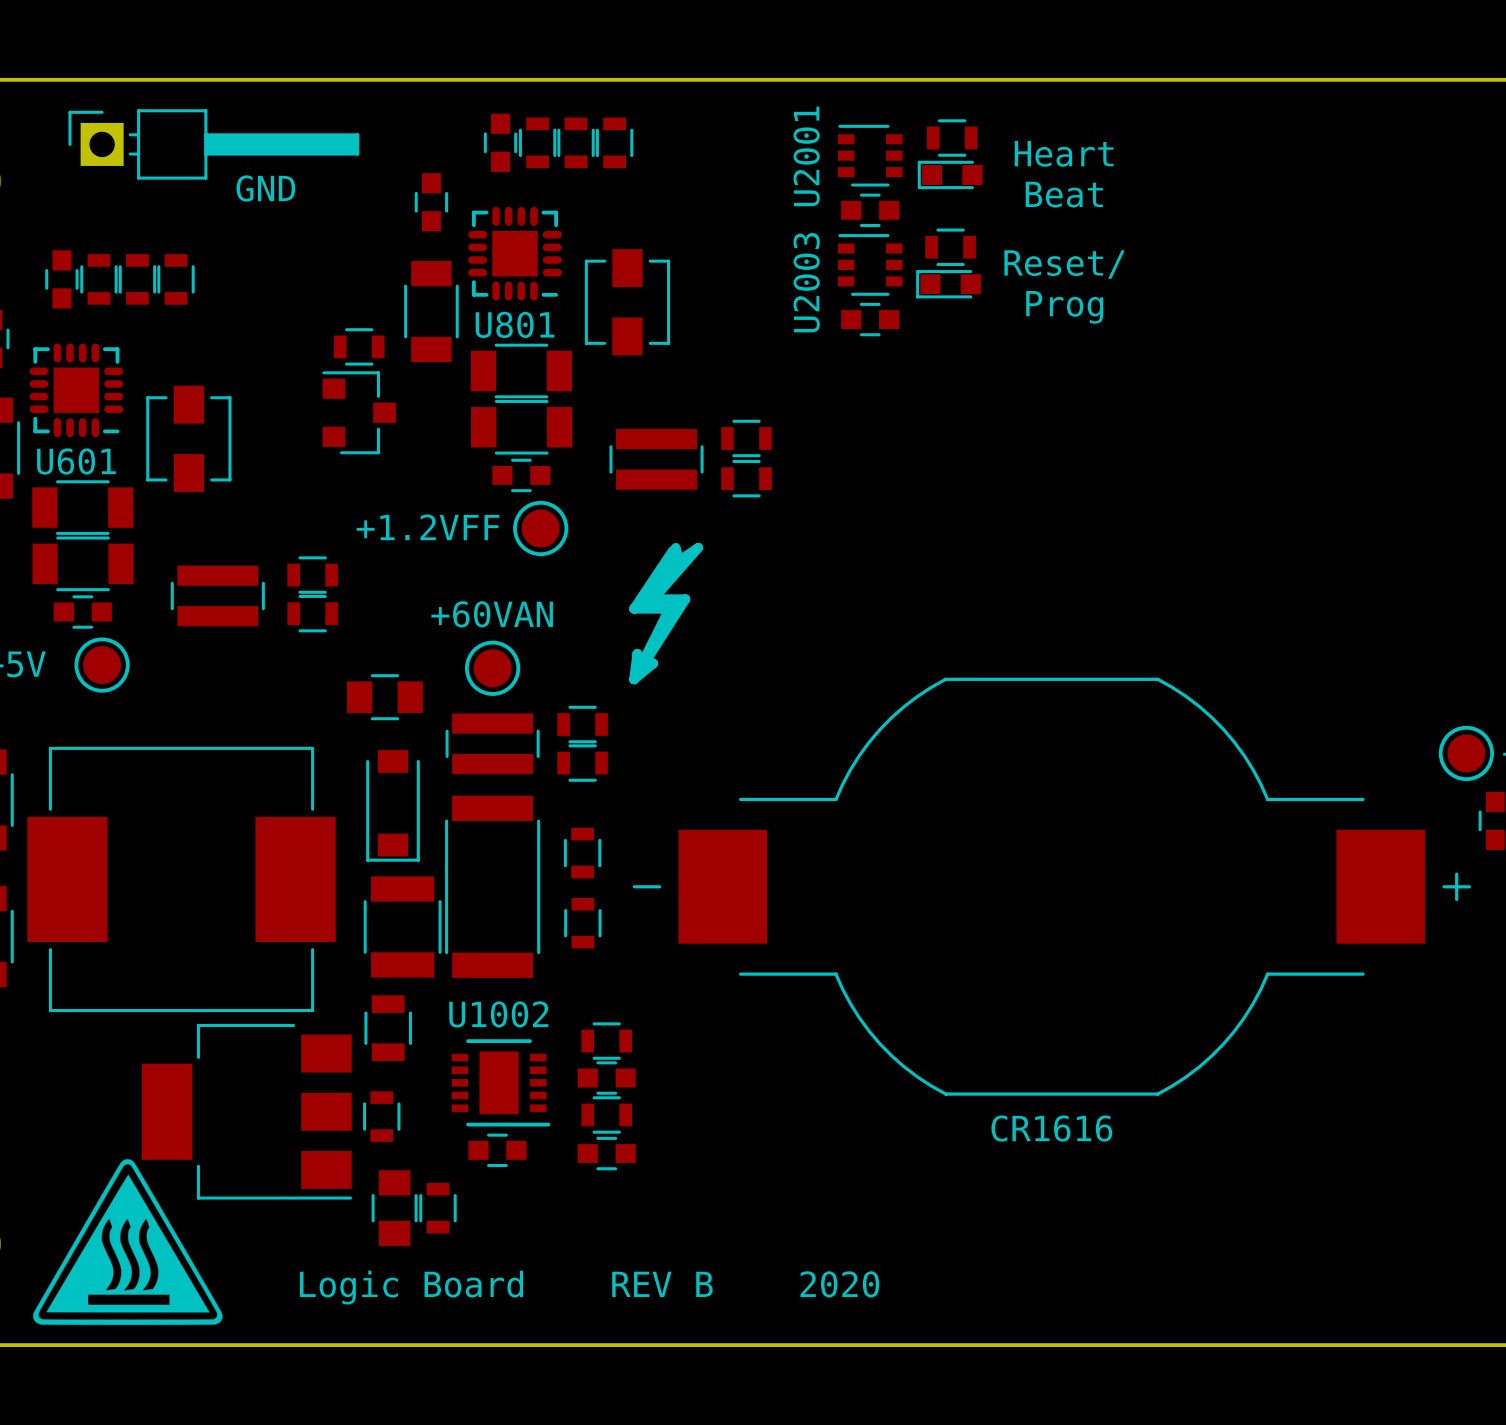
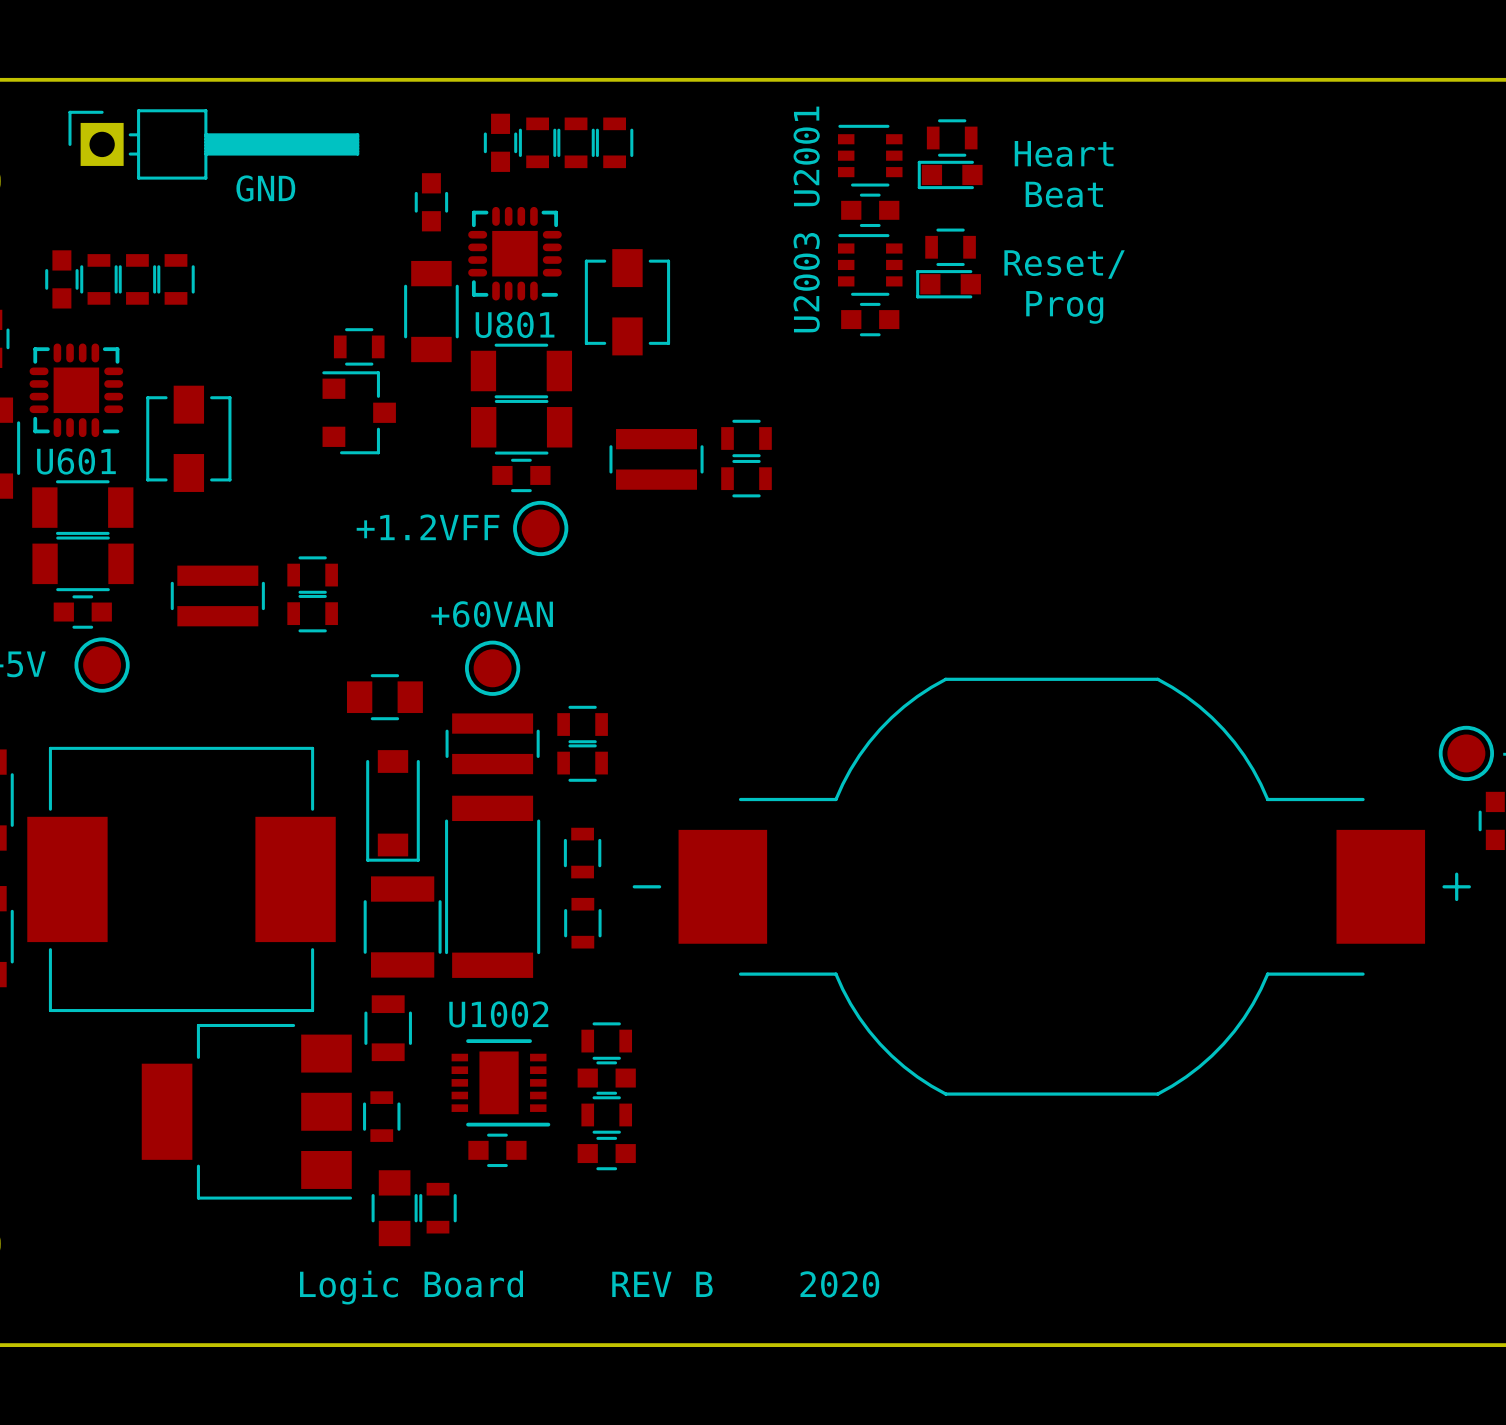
drawing: [629, 542, 704, 685] -> none
text: CR1616 (1051, 1128) -> none
drawing: [33, 1159, 223, 1325] -> none

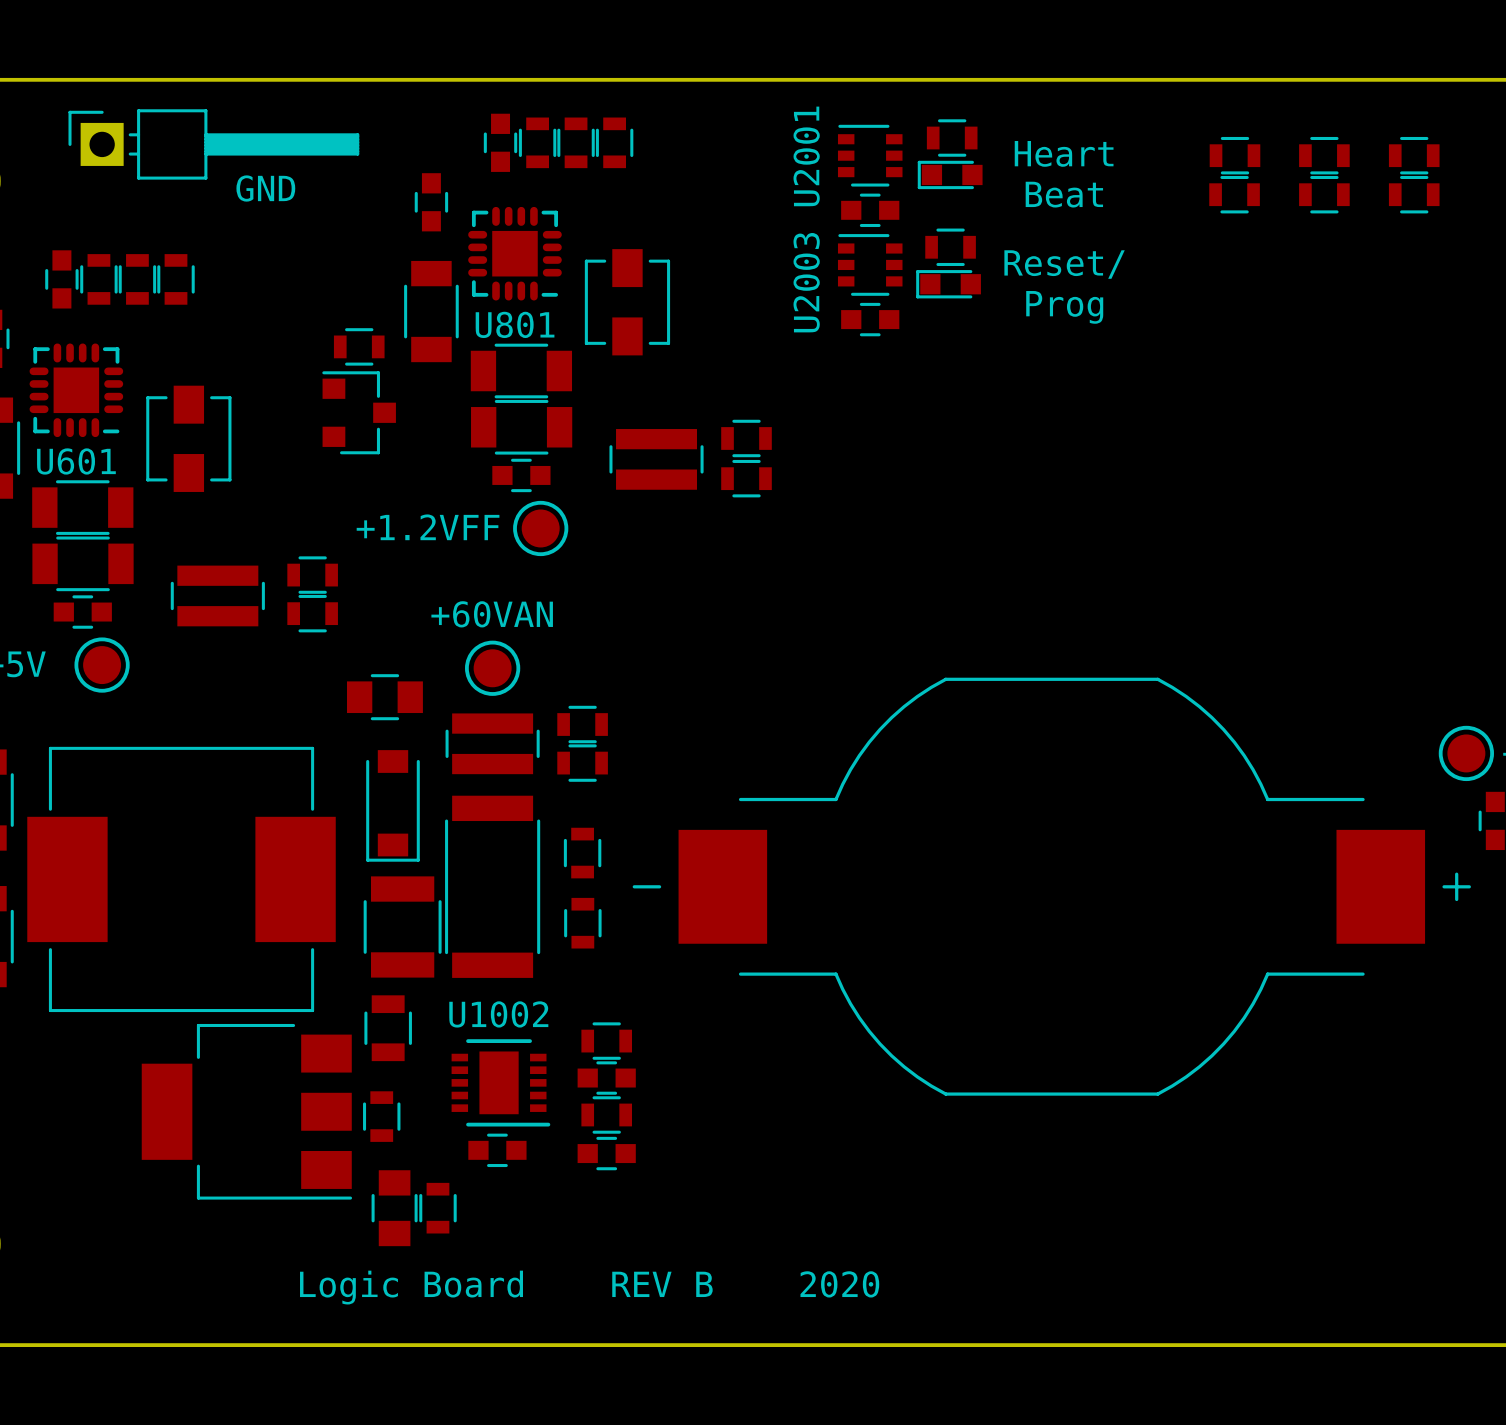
part: none -> (1234, 155)
part: none -> (1324, 155)
part: none -> (1414, 155)
part: none -> (1234, 194)
part: none -> (1324, 194)
part: none -> (1414, 194)

